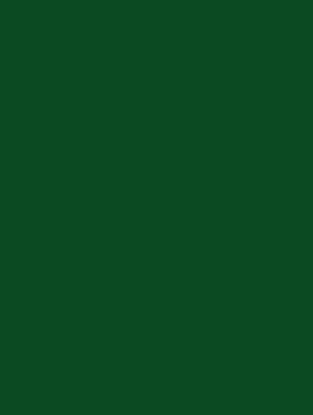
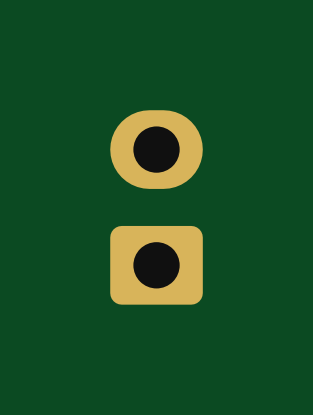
part: none -> (156, 207)

